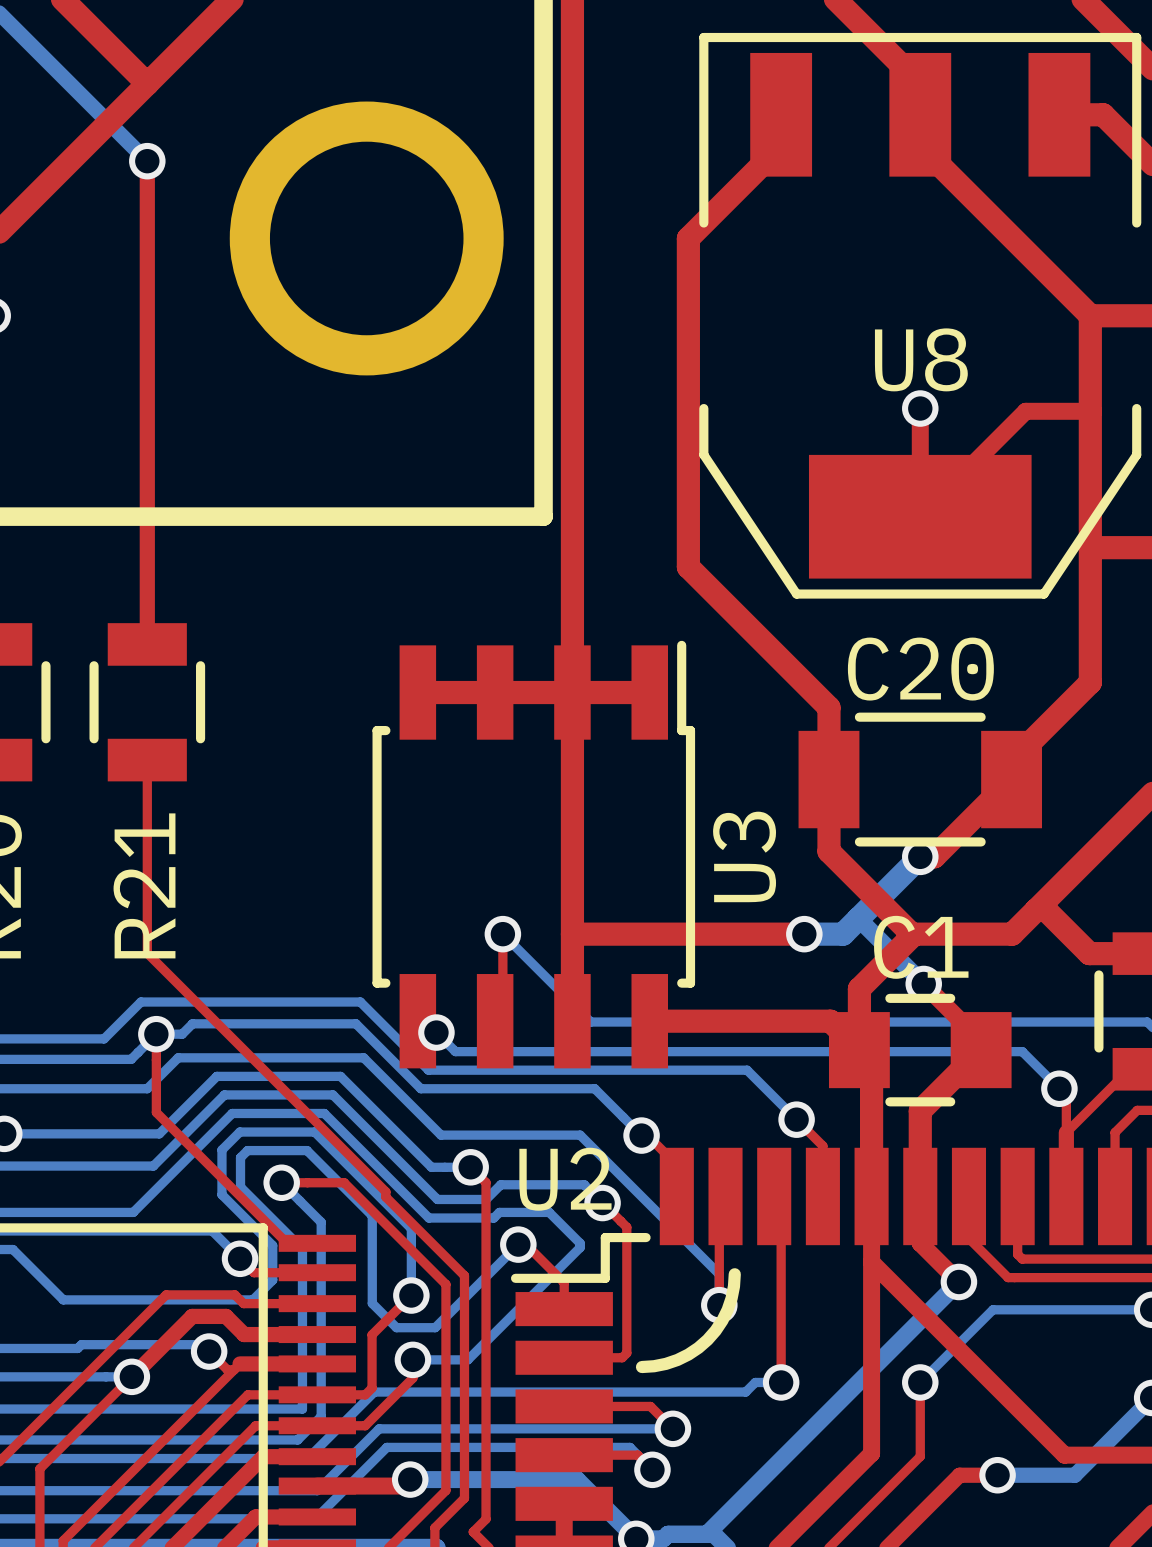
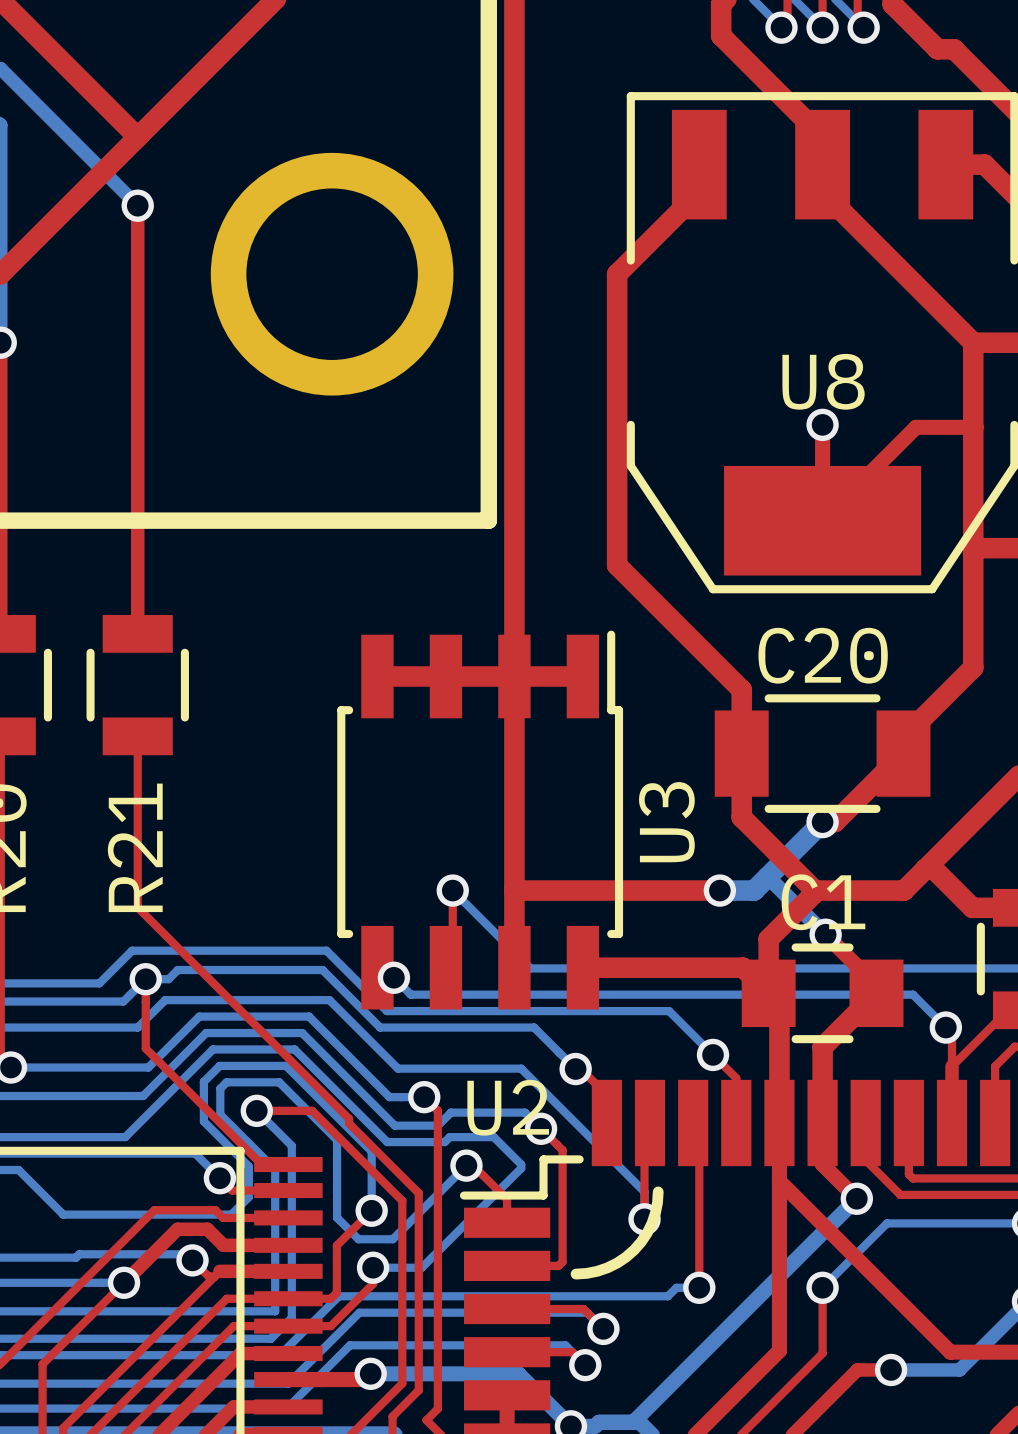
bottom track: (379, 1428) (672, 1428) -> (343, 1328) (359, 1312) (587, 1312) (603, 1328)

